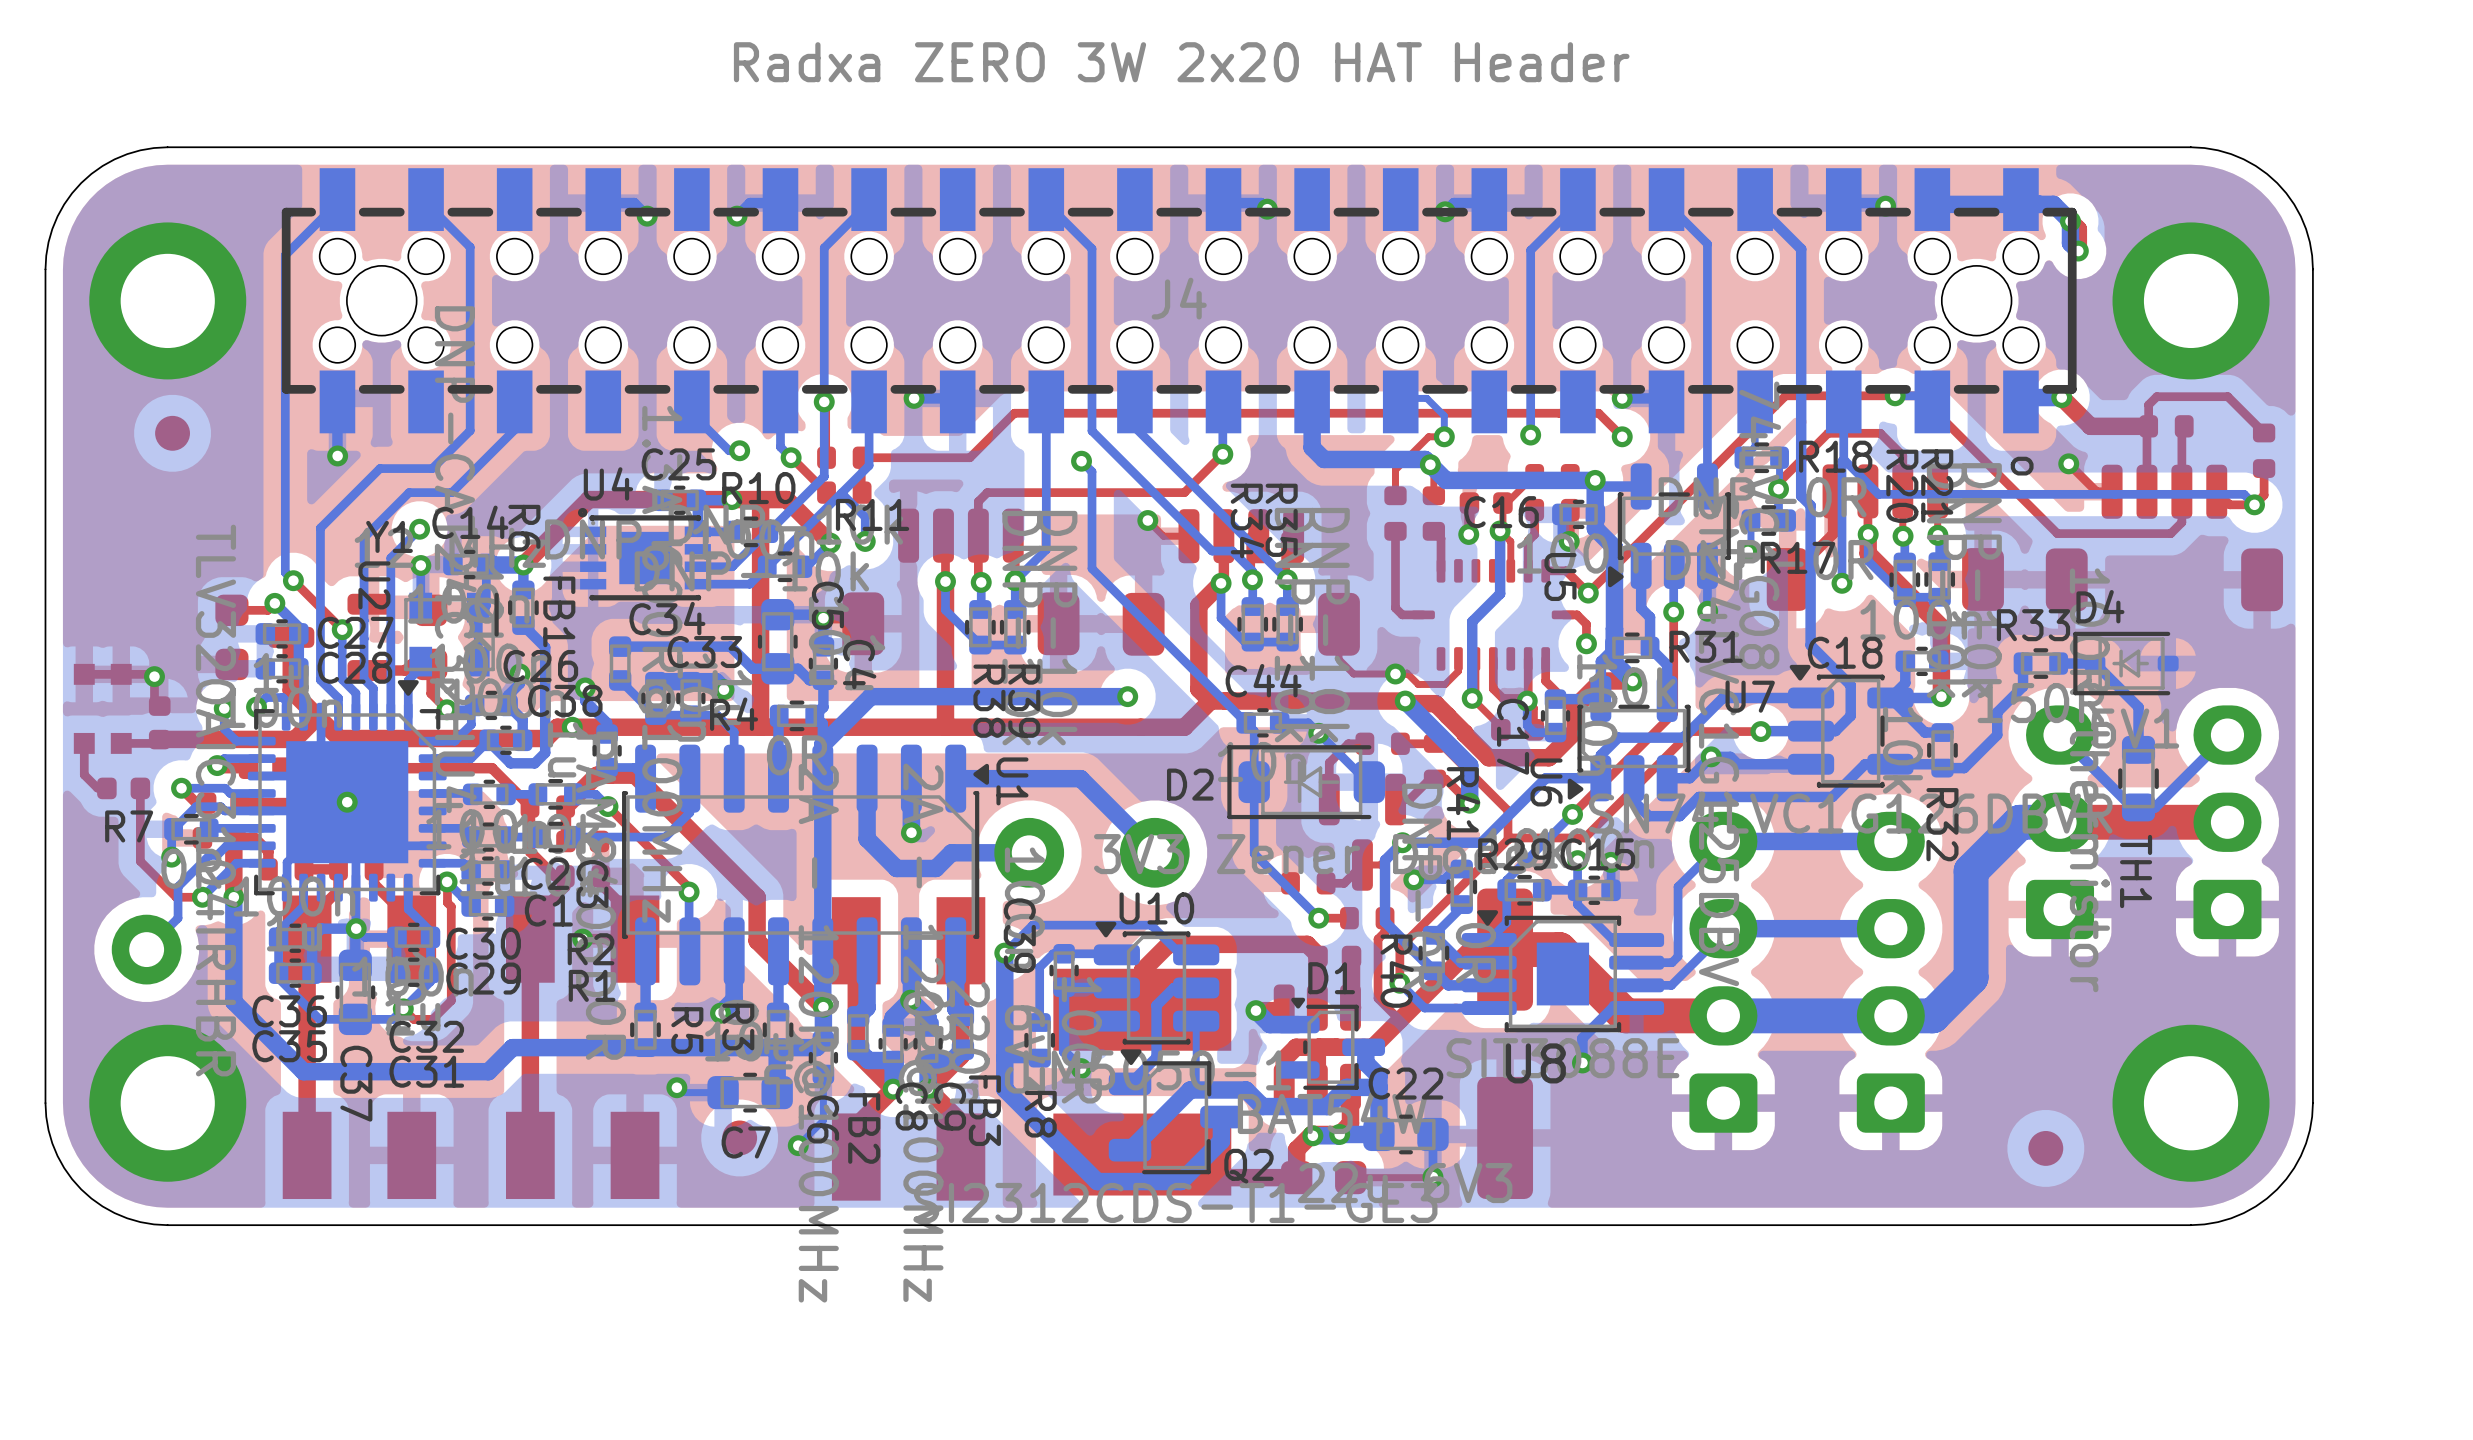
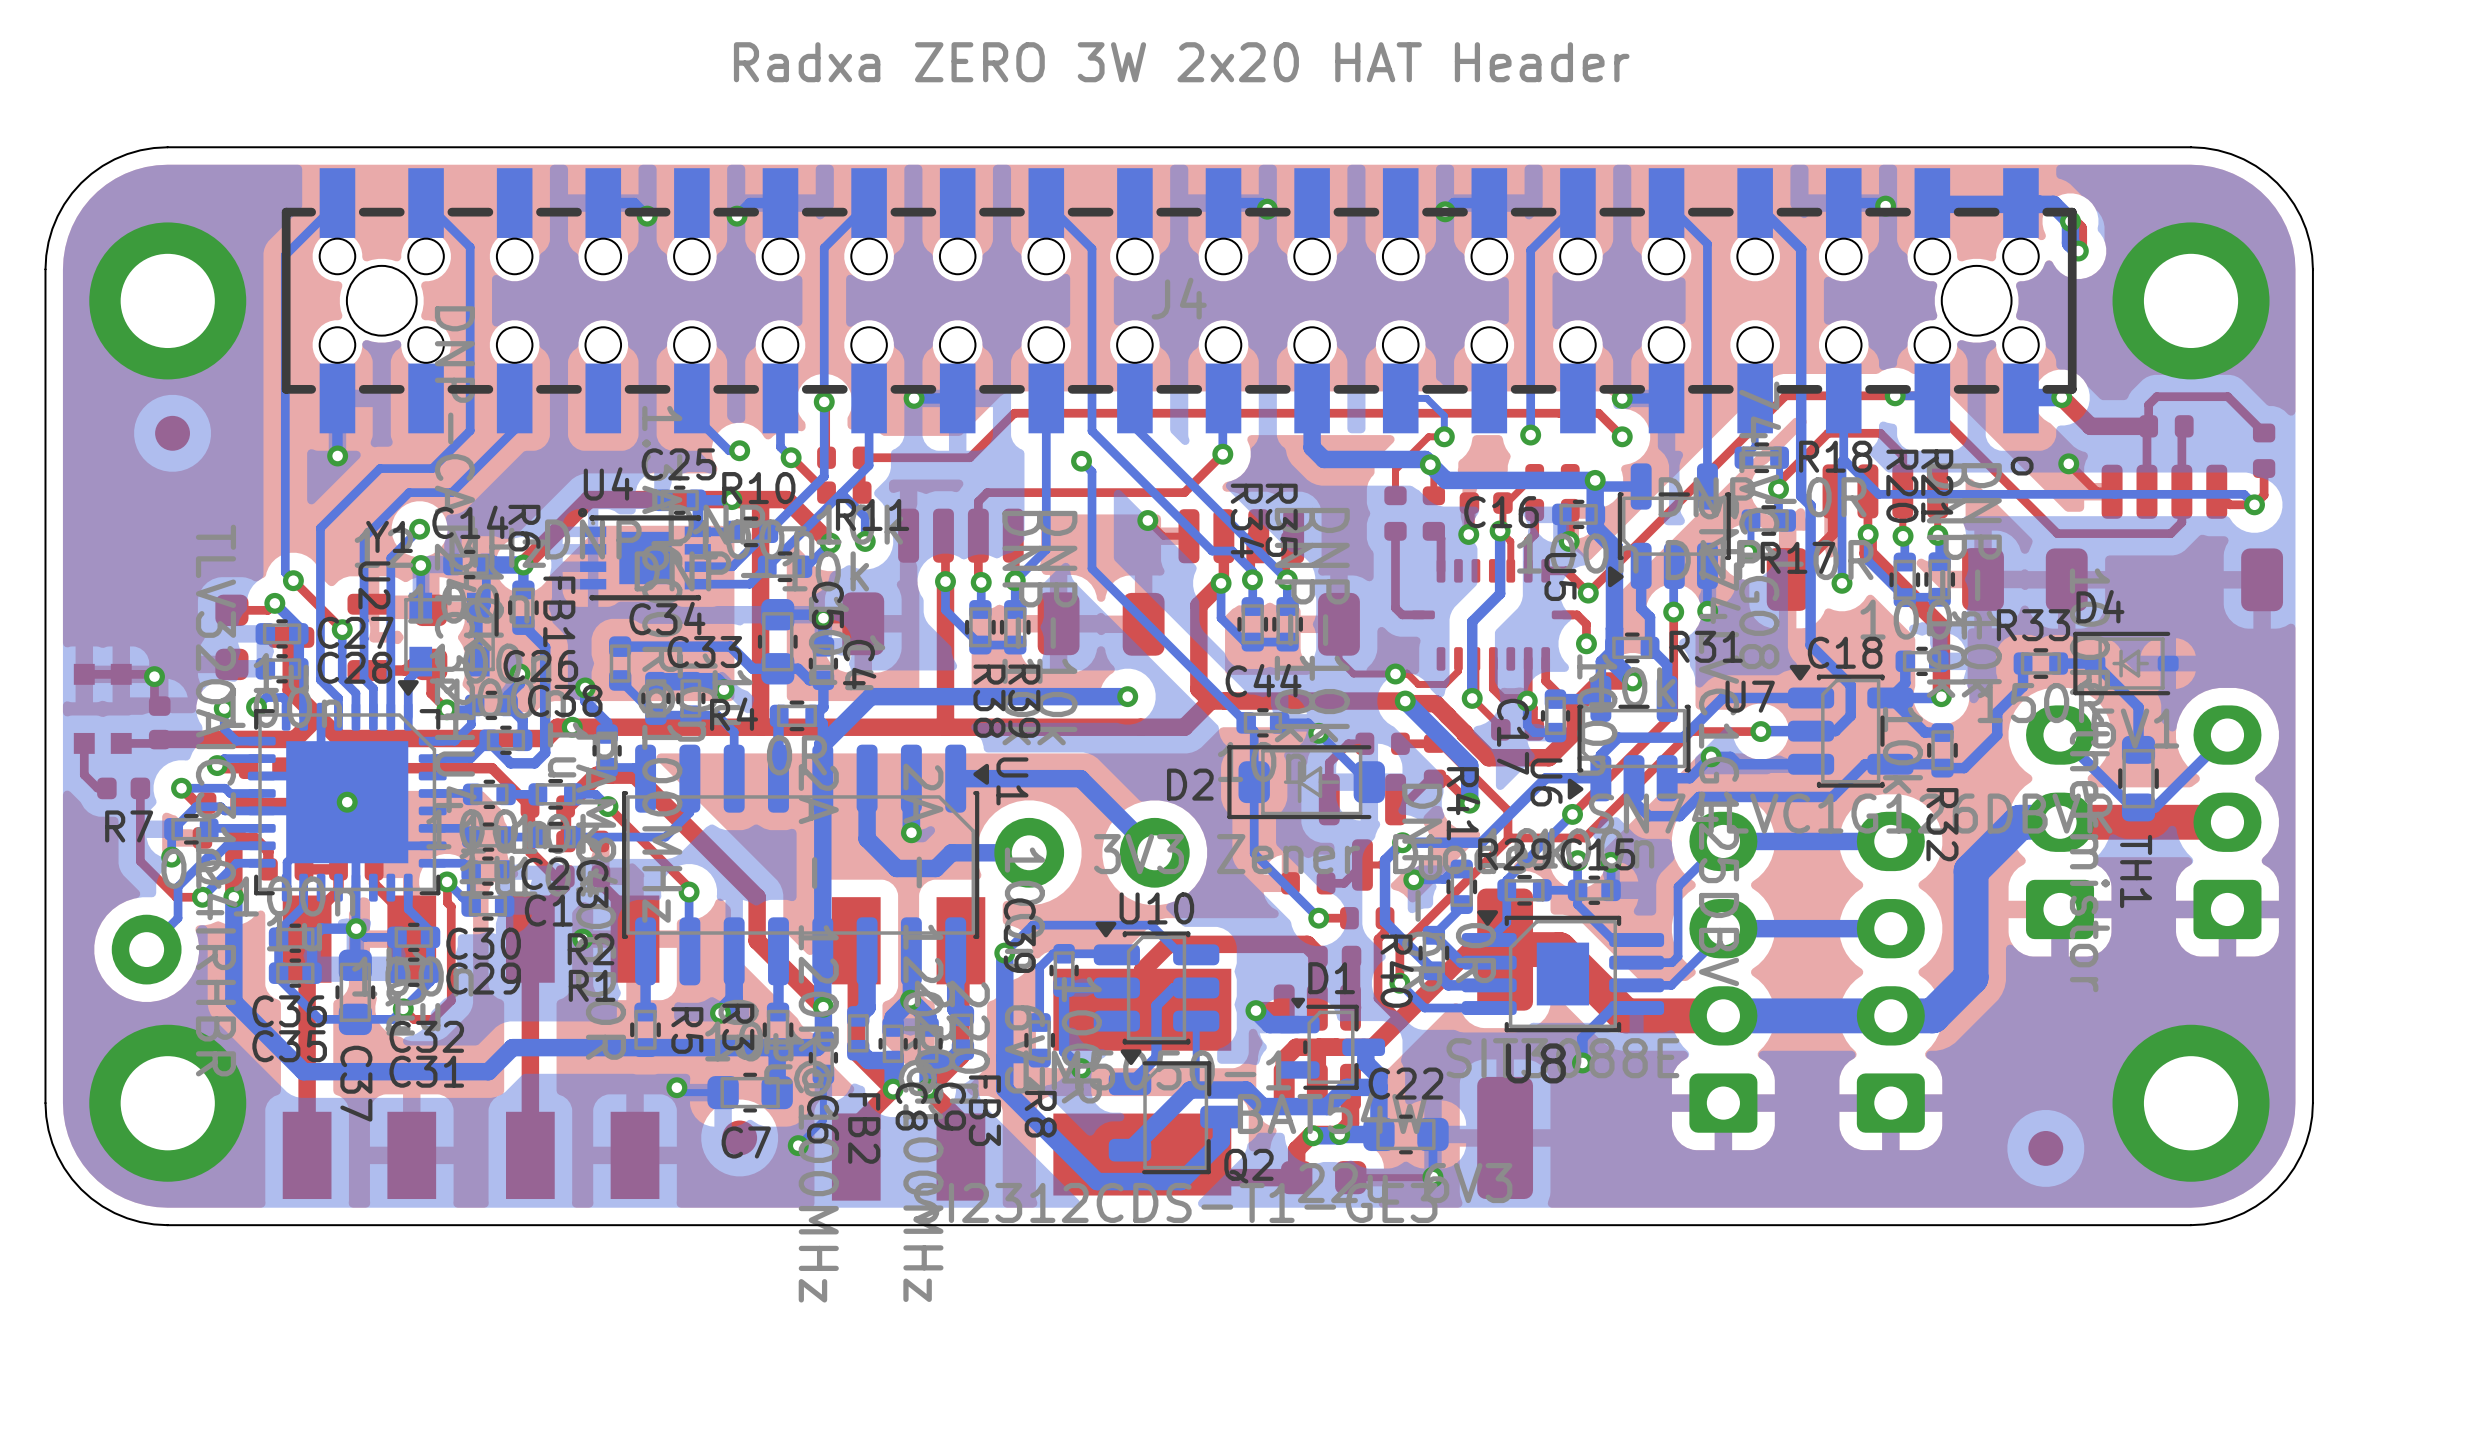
part footprint: [89, 168, 2270, 1182] -> [89, 168, 2270, 1182]

